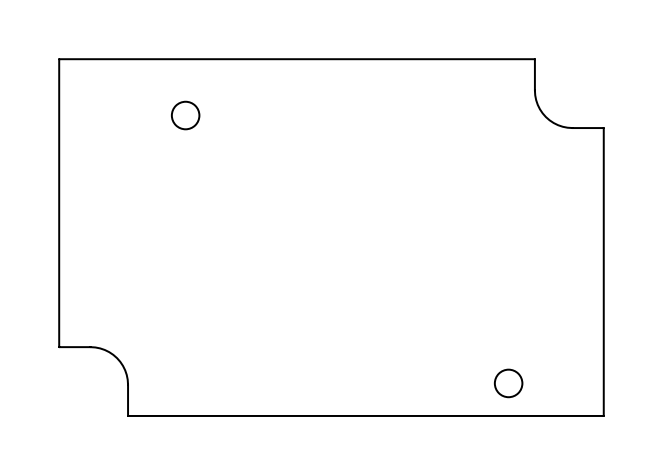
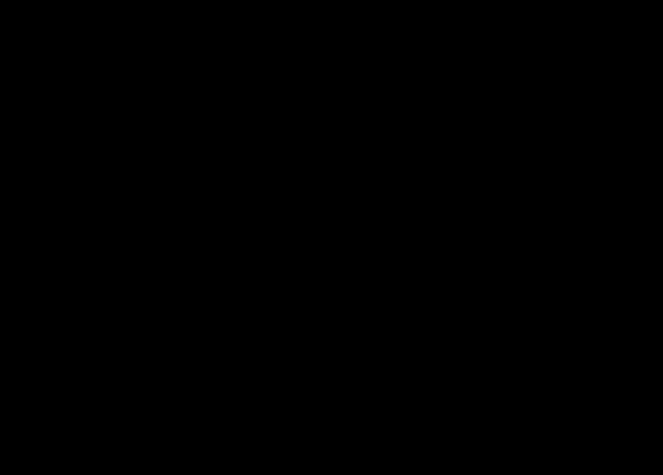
board edge: (59, 59) (59, 347) (95, 347) (104, 349) (117, 358) (125, 370) (127, 379) (128, 415) (603, 415) (603, 128) (567, 127) (558, 125) (545, 117) (537, 104) (535, 95) (534, 59) (59, 59) -> none
round board edge: [171, 101, 200, 130] -> none
round board edge: [494, 369, 523, 398] -> none

